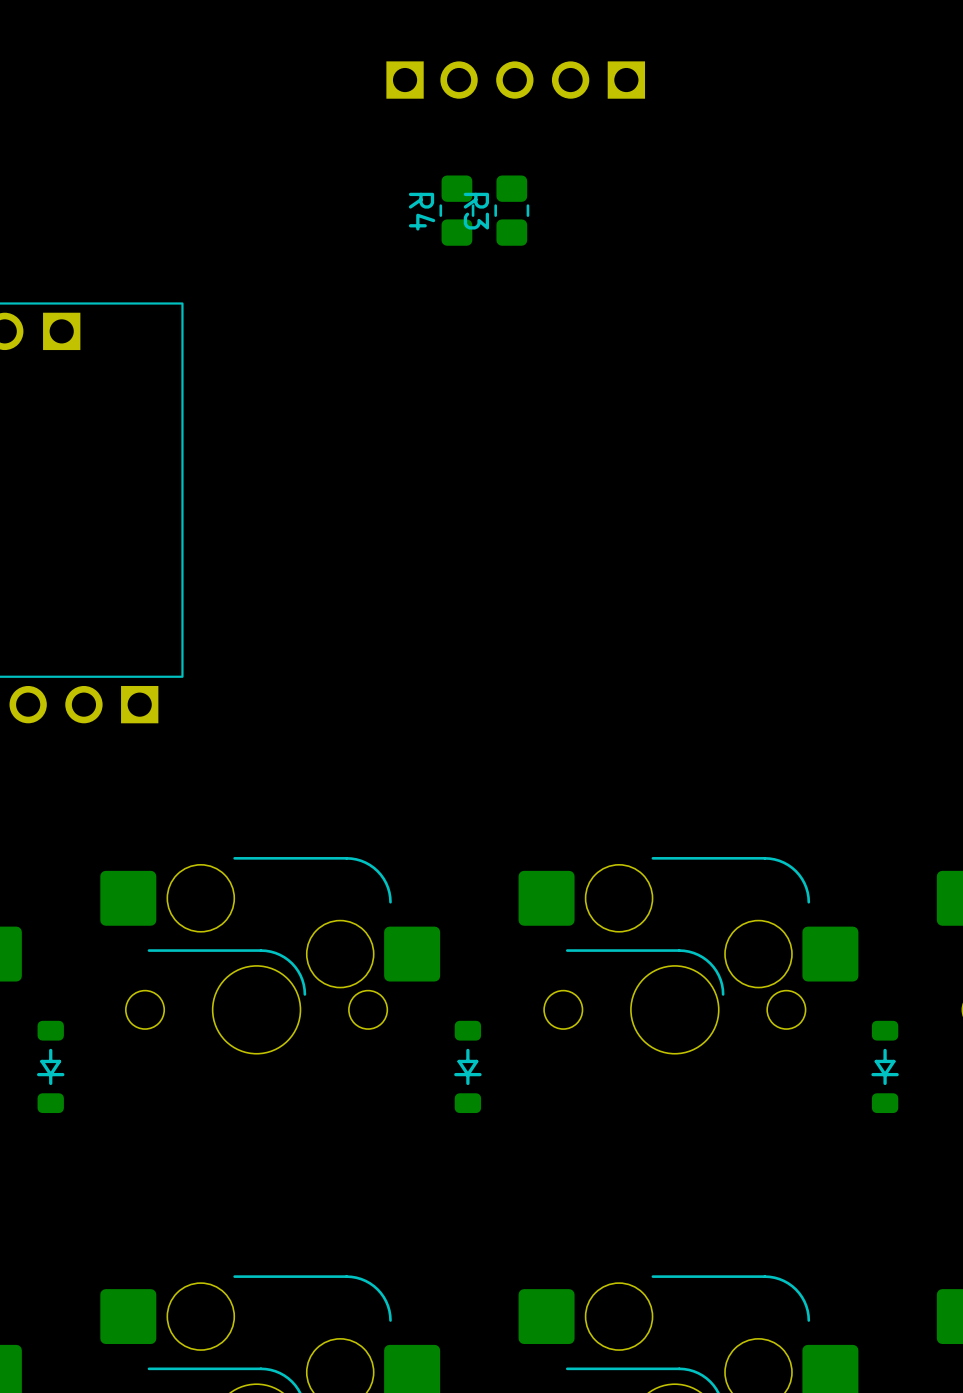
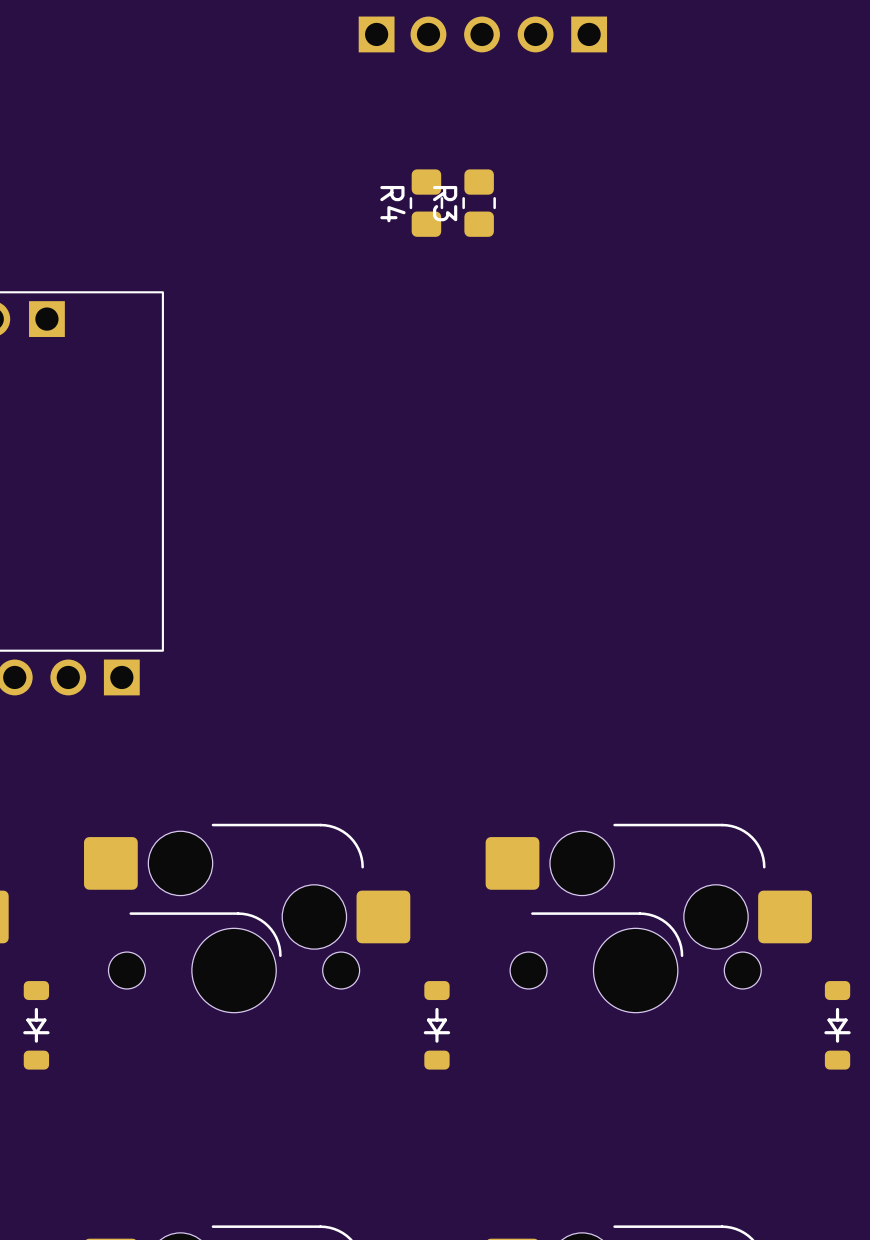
part position: (515, 80) -> (482, 34)

